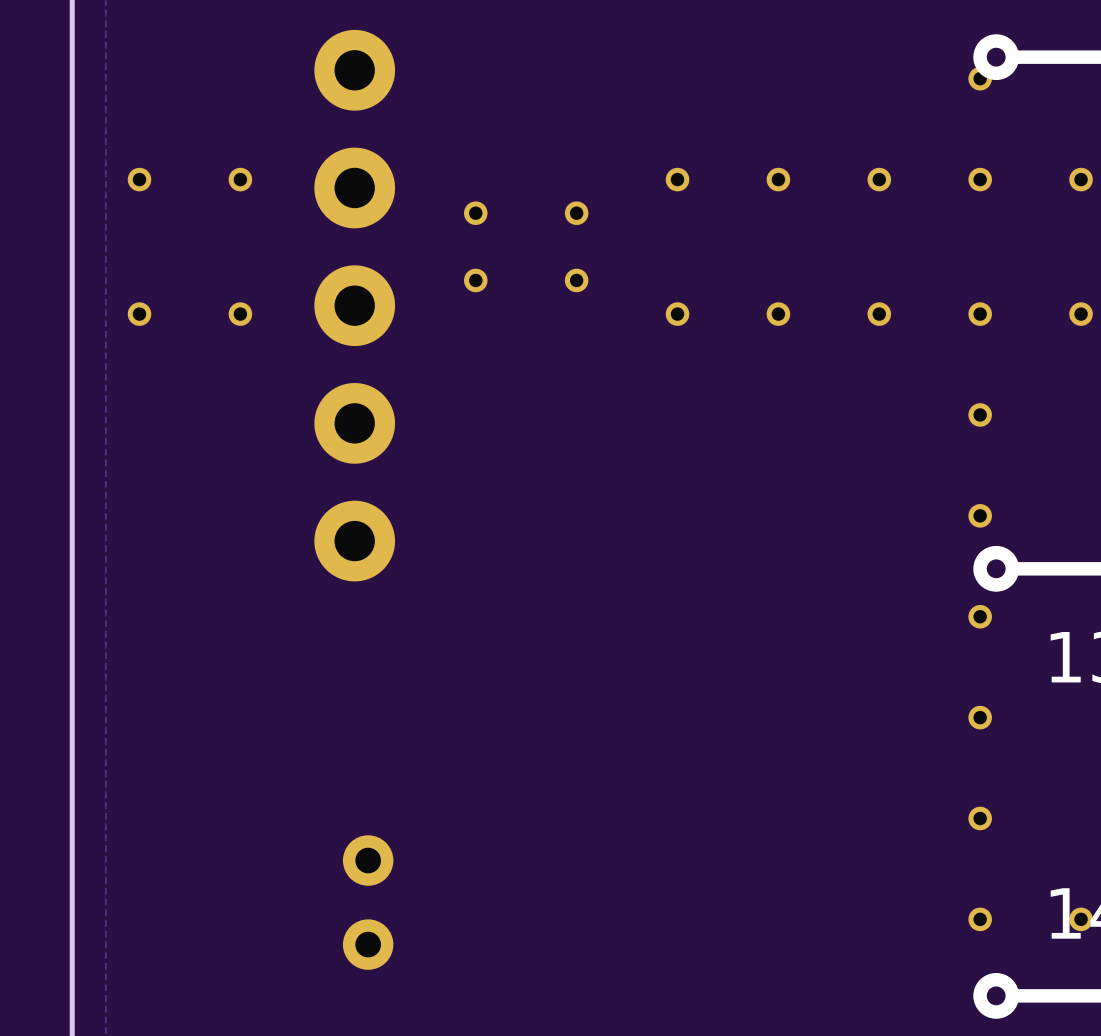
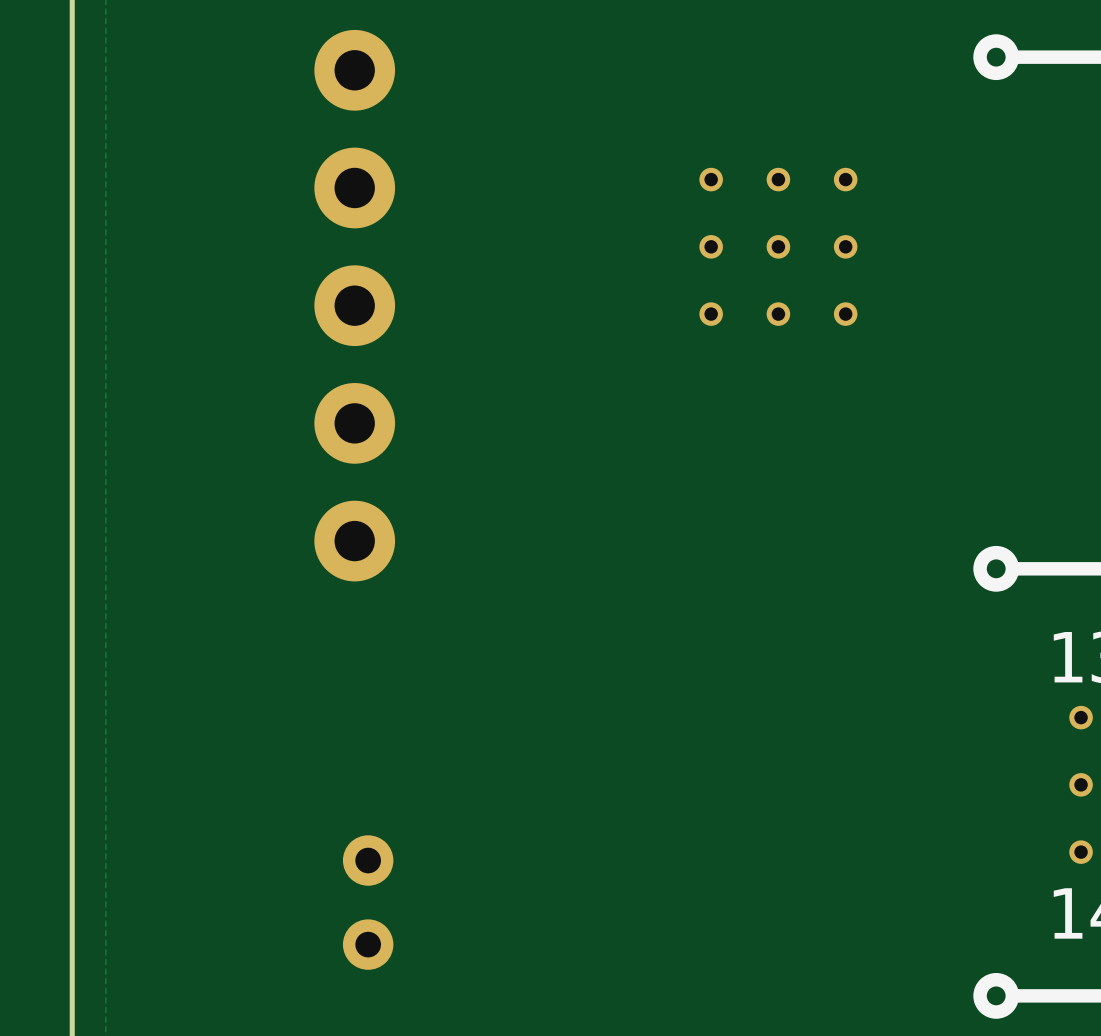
part: (980, 78) -> none
part: (139, 179) -> none
part: (240, 179) -> none
part position: (677, 179) -> (711, 179)
part position: (879, 179) -> (845, 179)
part: (980, 179) -> none
part: (1081, 179) -> none
part: (475, 213) -> none
part: (576, 213) -> none
part: none -> (711, 246)
part: none -> (778, 246)
part: none -> (845, 246)
part: (475, 280) -> none
part: (576, 280) -> none
part: (139, 314) -> none
part: (240, 314) -> none
part position: (677, 314) -> (711, 314)
part position: (879, 314) -> (845, 314)
part: (980, 314) -> none
part: (1081, 314) -> none
part: (980, 414) -> none
part: (980, 515) -> none
part: (980, 616) -> none
part: (980, 717) -> none
part: none -> (1081, 717)
part: none -> (1081, 784)
part: (980, 818) -> none
part: none -> (1081, 852)
part: (980, 919) -> none
part: (1081, 919) -> none

